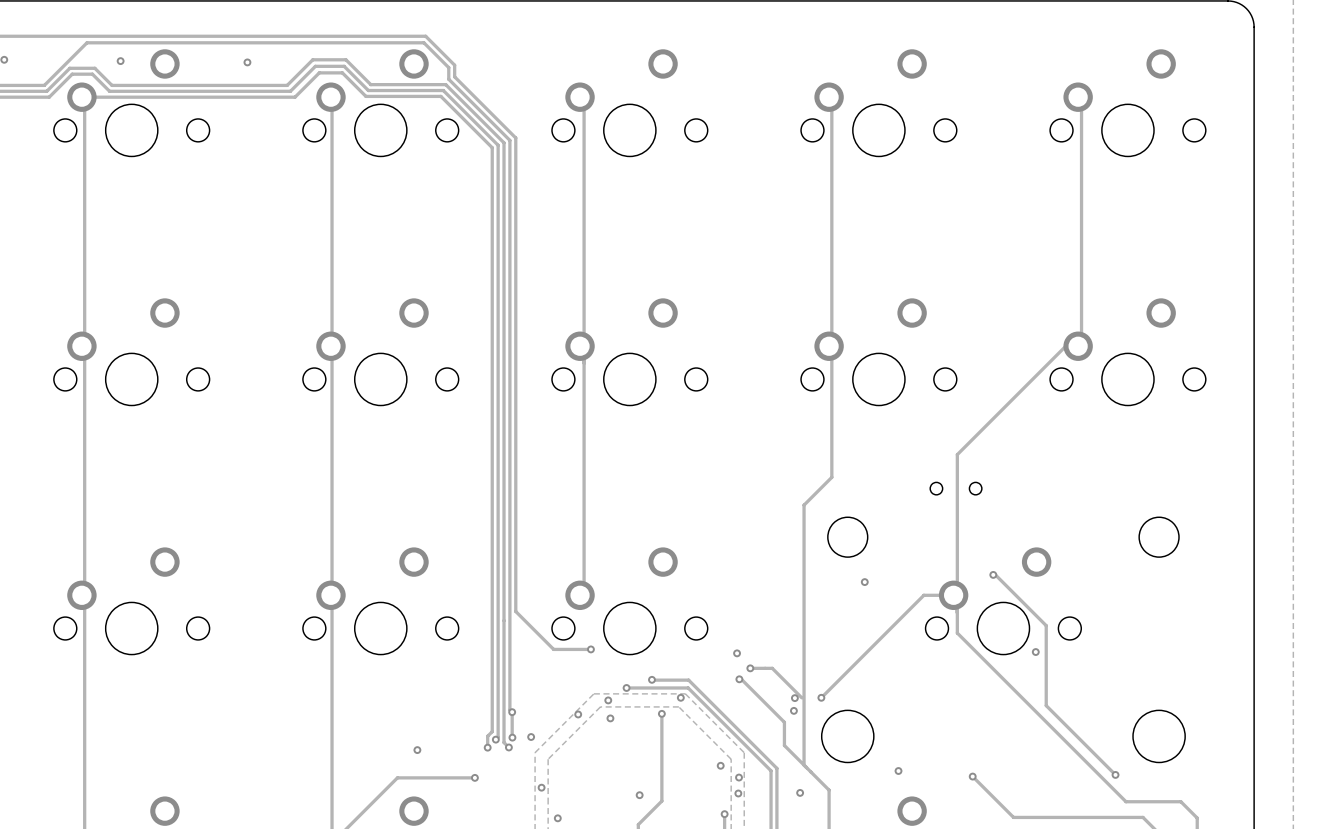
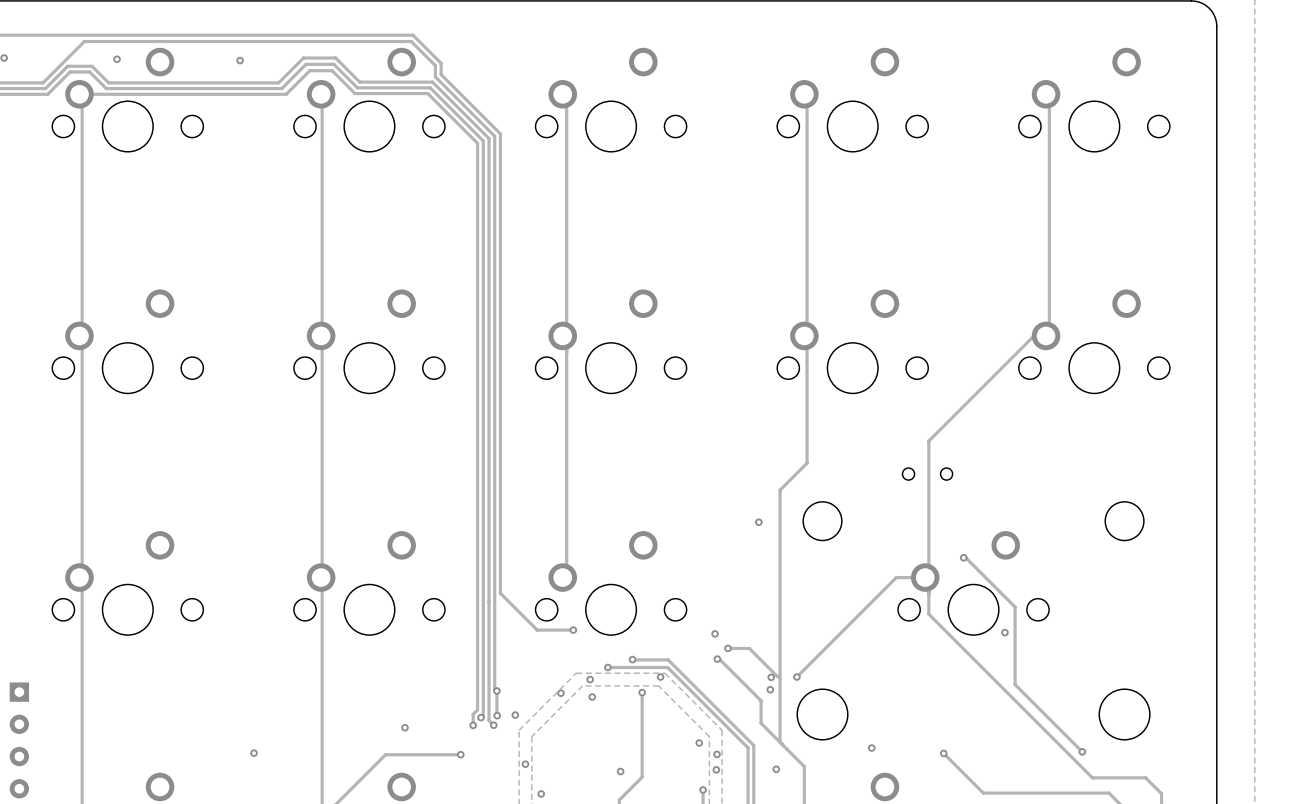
via: none -> (758, 522)
via: (864, 582) -> none
part: none -> (19, 740)
via: none -> (254, 753)

